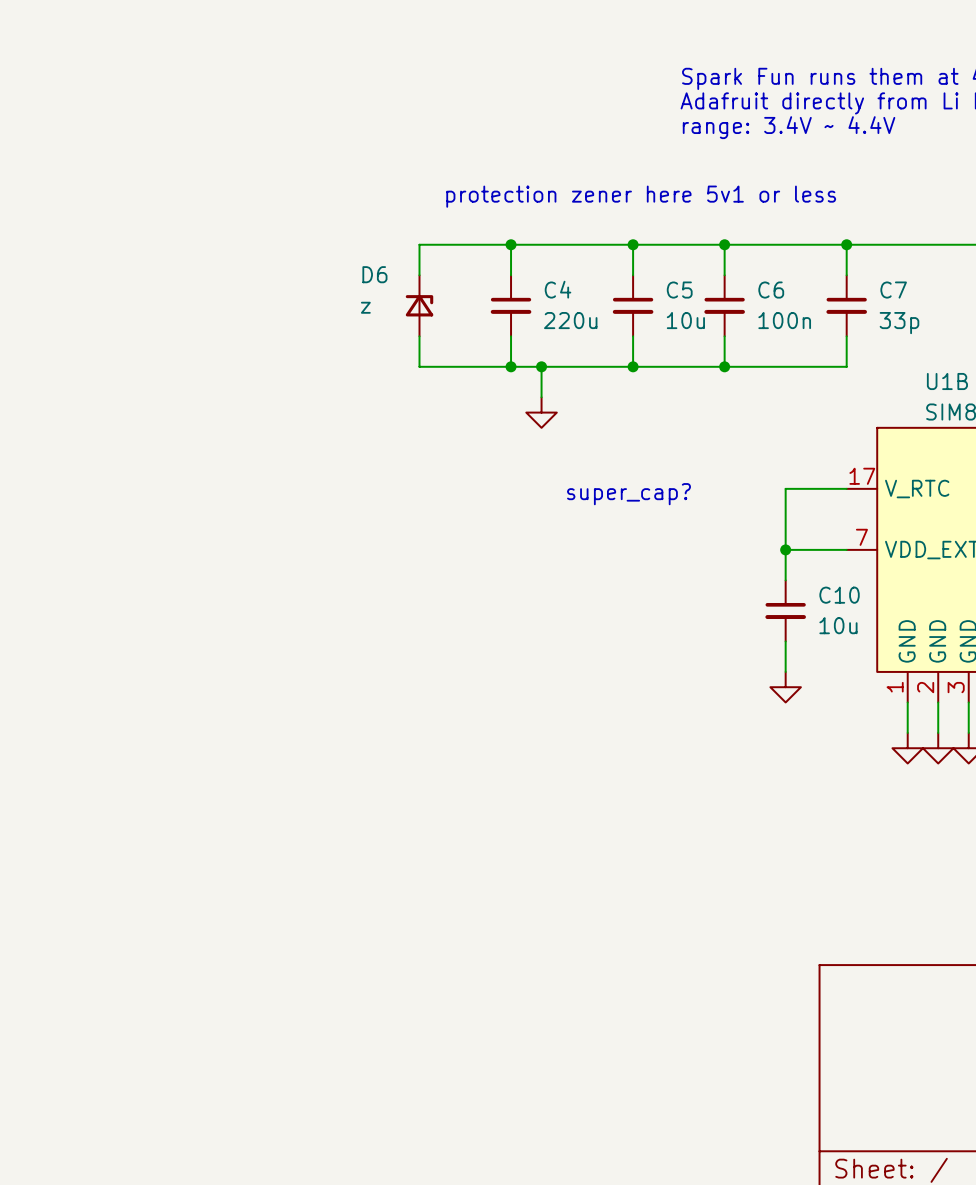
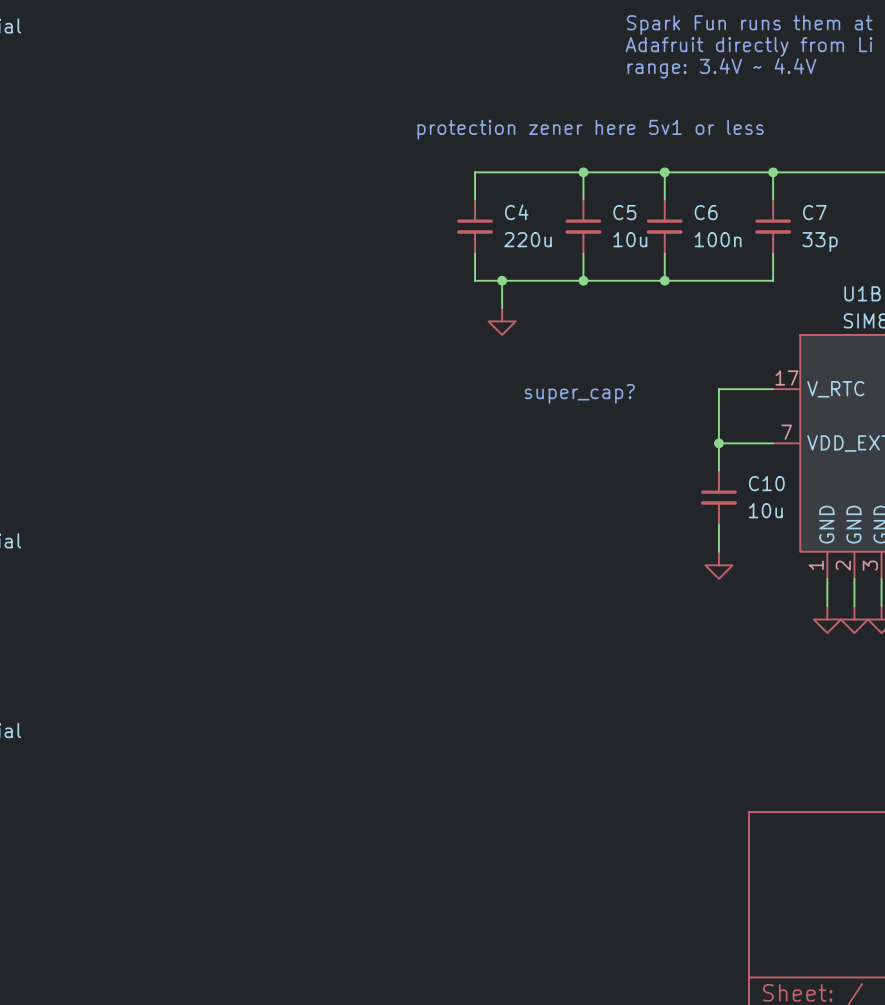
wire: (511, 244) (419, 244) (419, 275) -> none
junction: (511, 244) -> none
D6: z (419, 305) -> none
wire: (419, 336) (419, 366) (511, 366) -> none
junction: (511, 366) -> none

